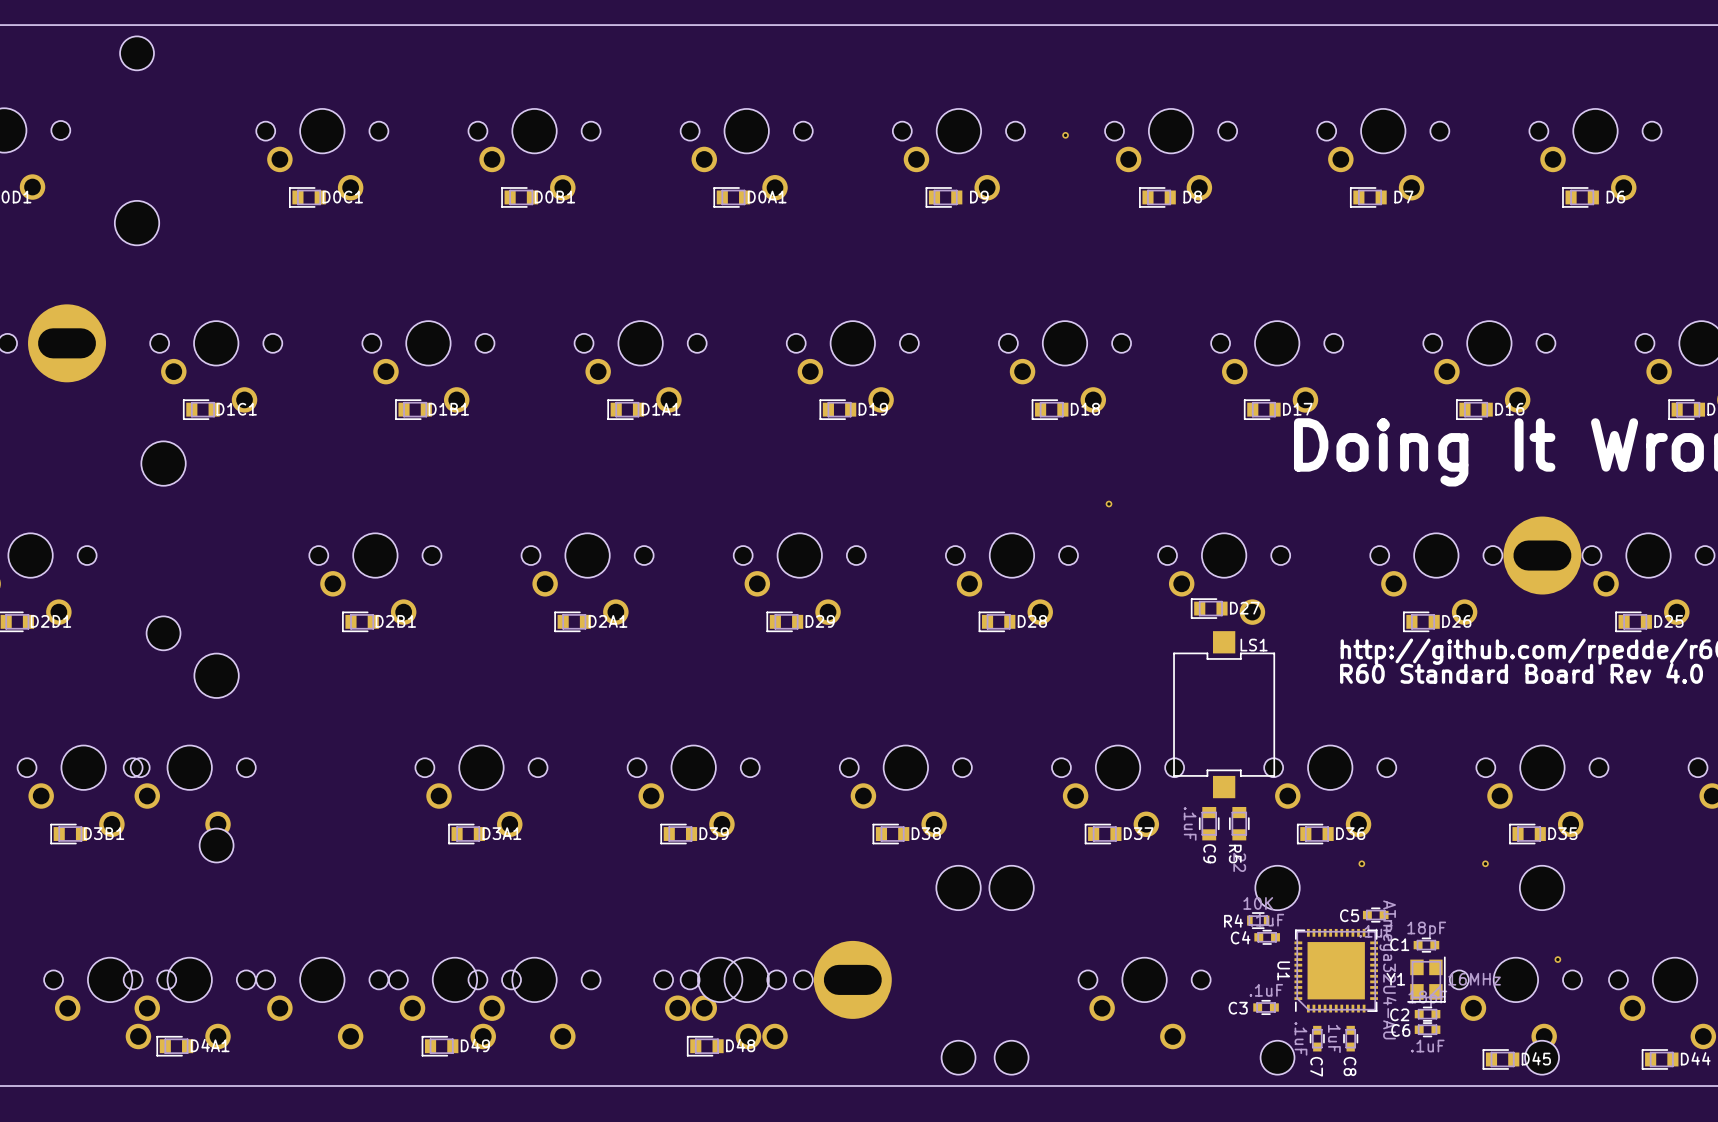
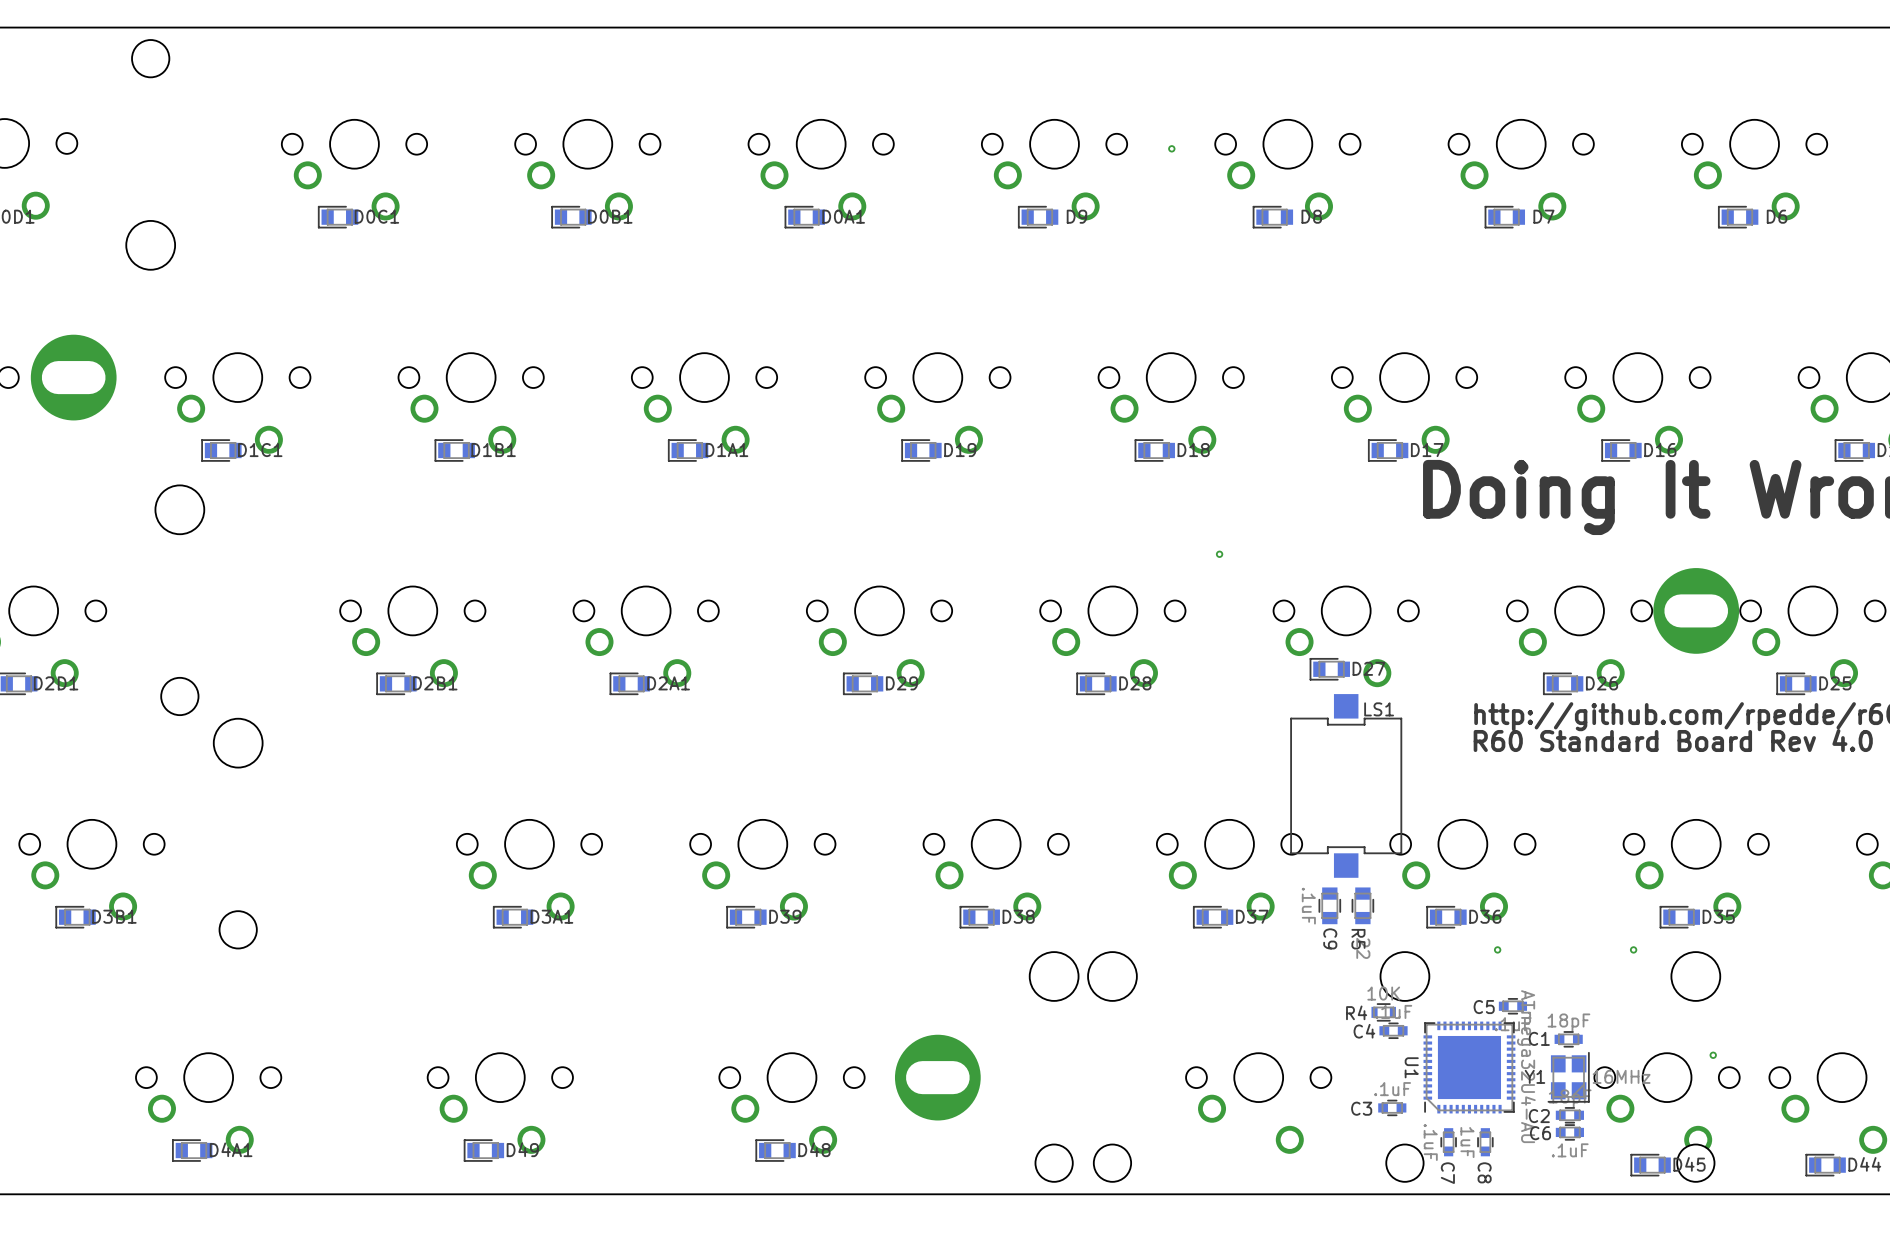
part: (189, 791) -> none
part: (110, 1003) -> none
part: (322, 1003) -> none
part: (534, 1003) -> none
part: (746, 1003) -> none

